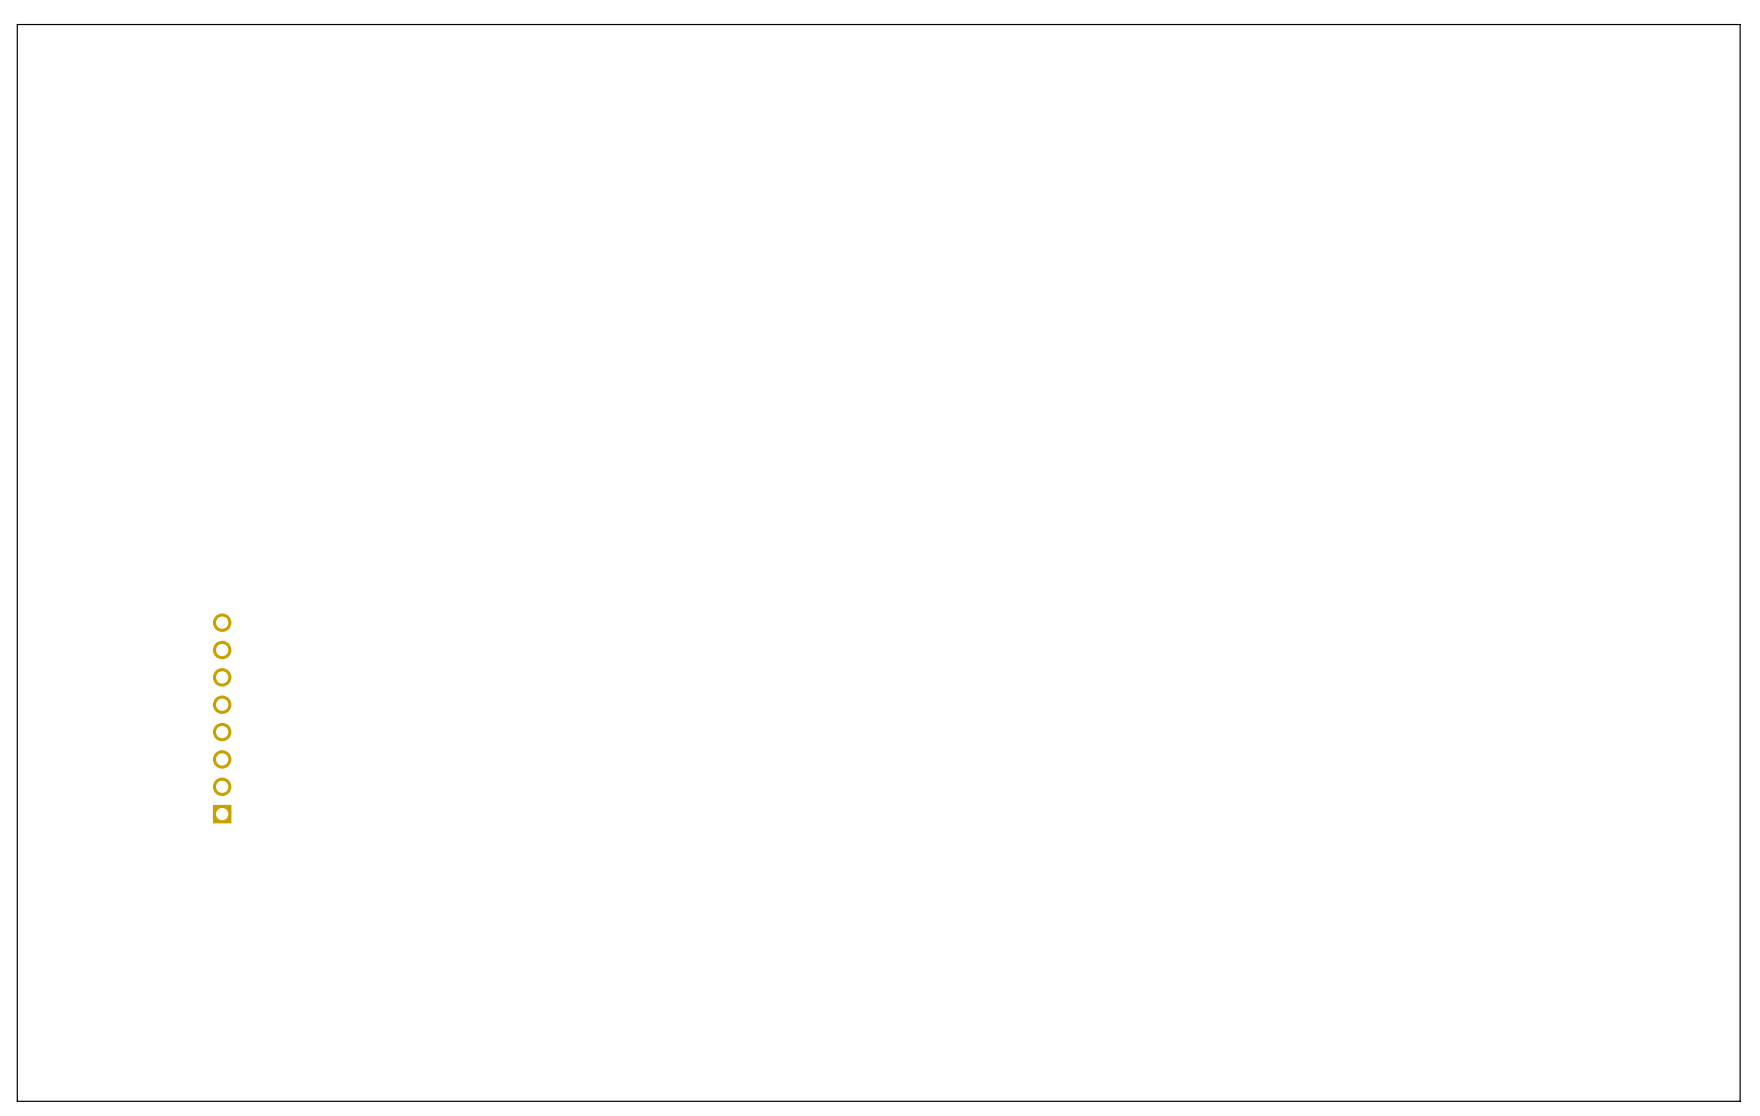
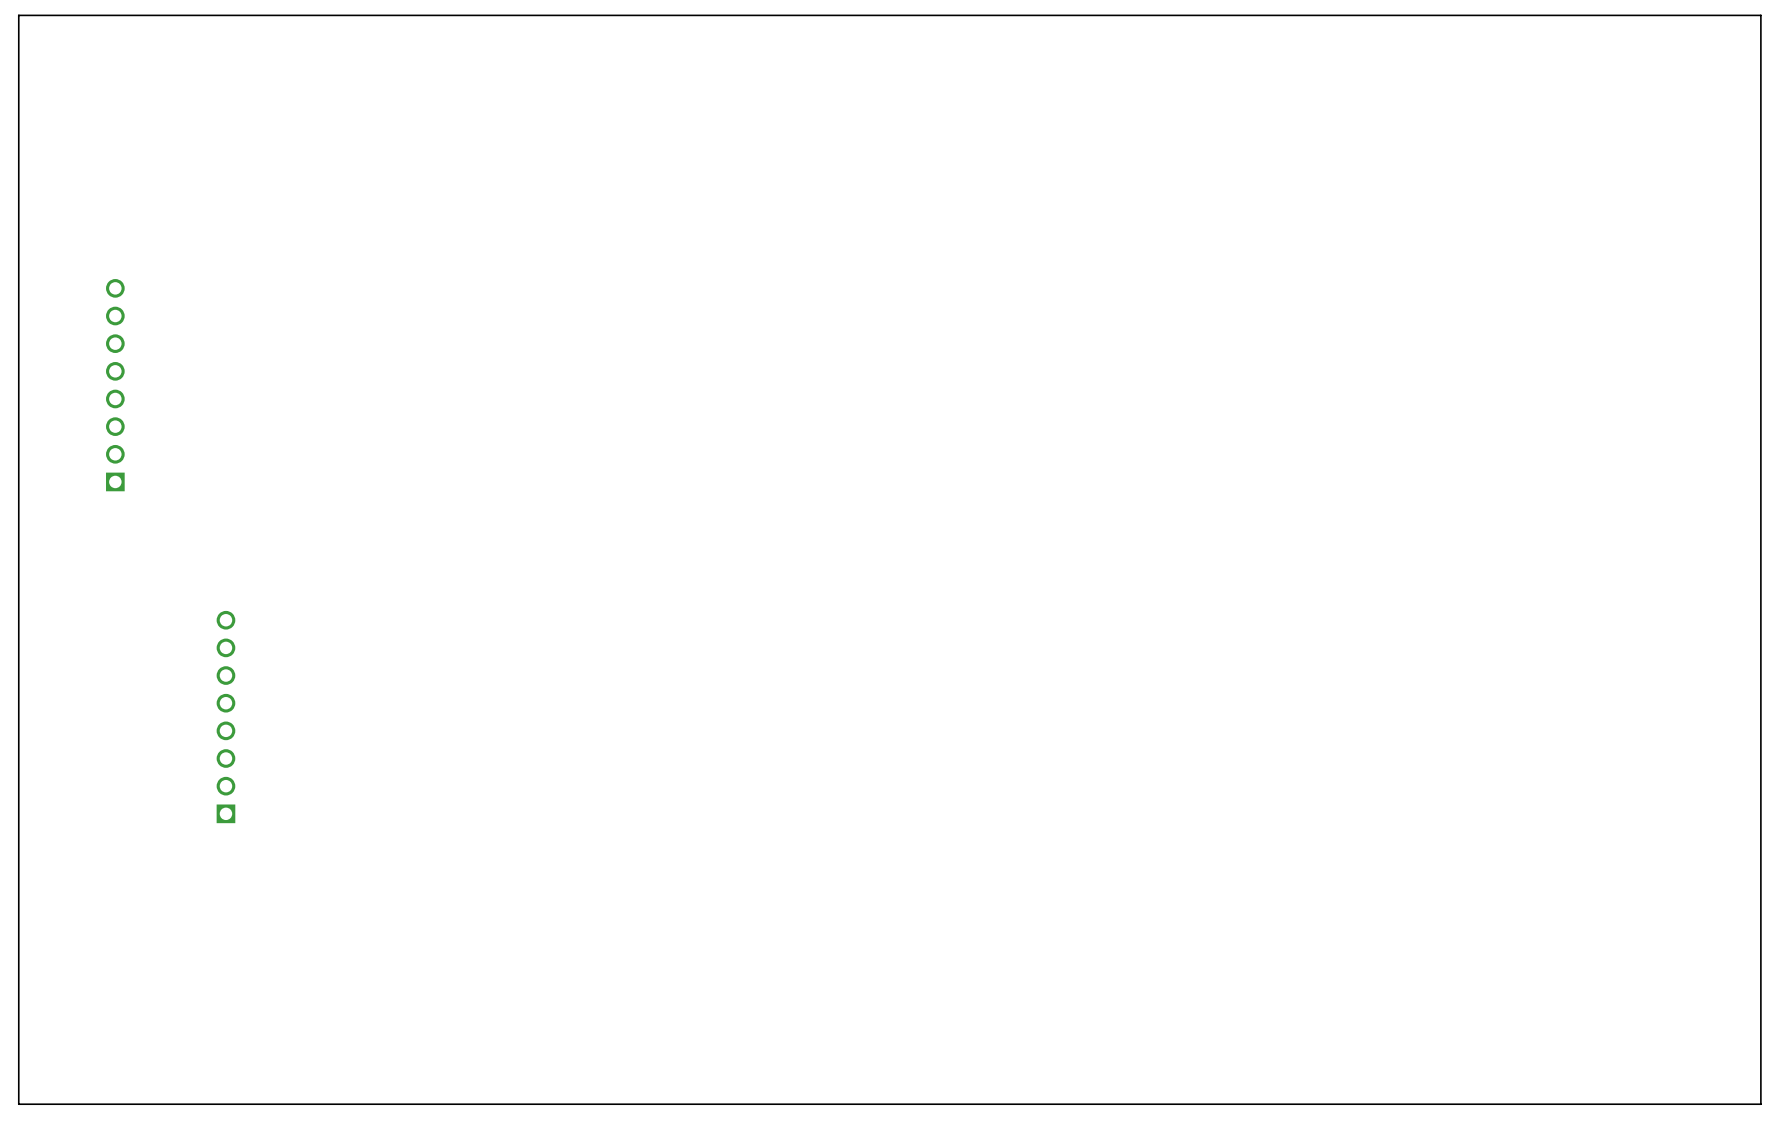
part: none -> (115, 385)

